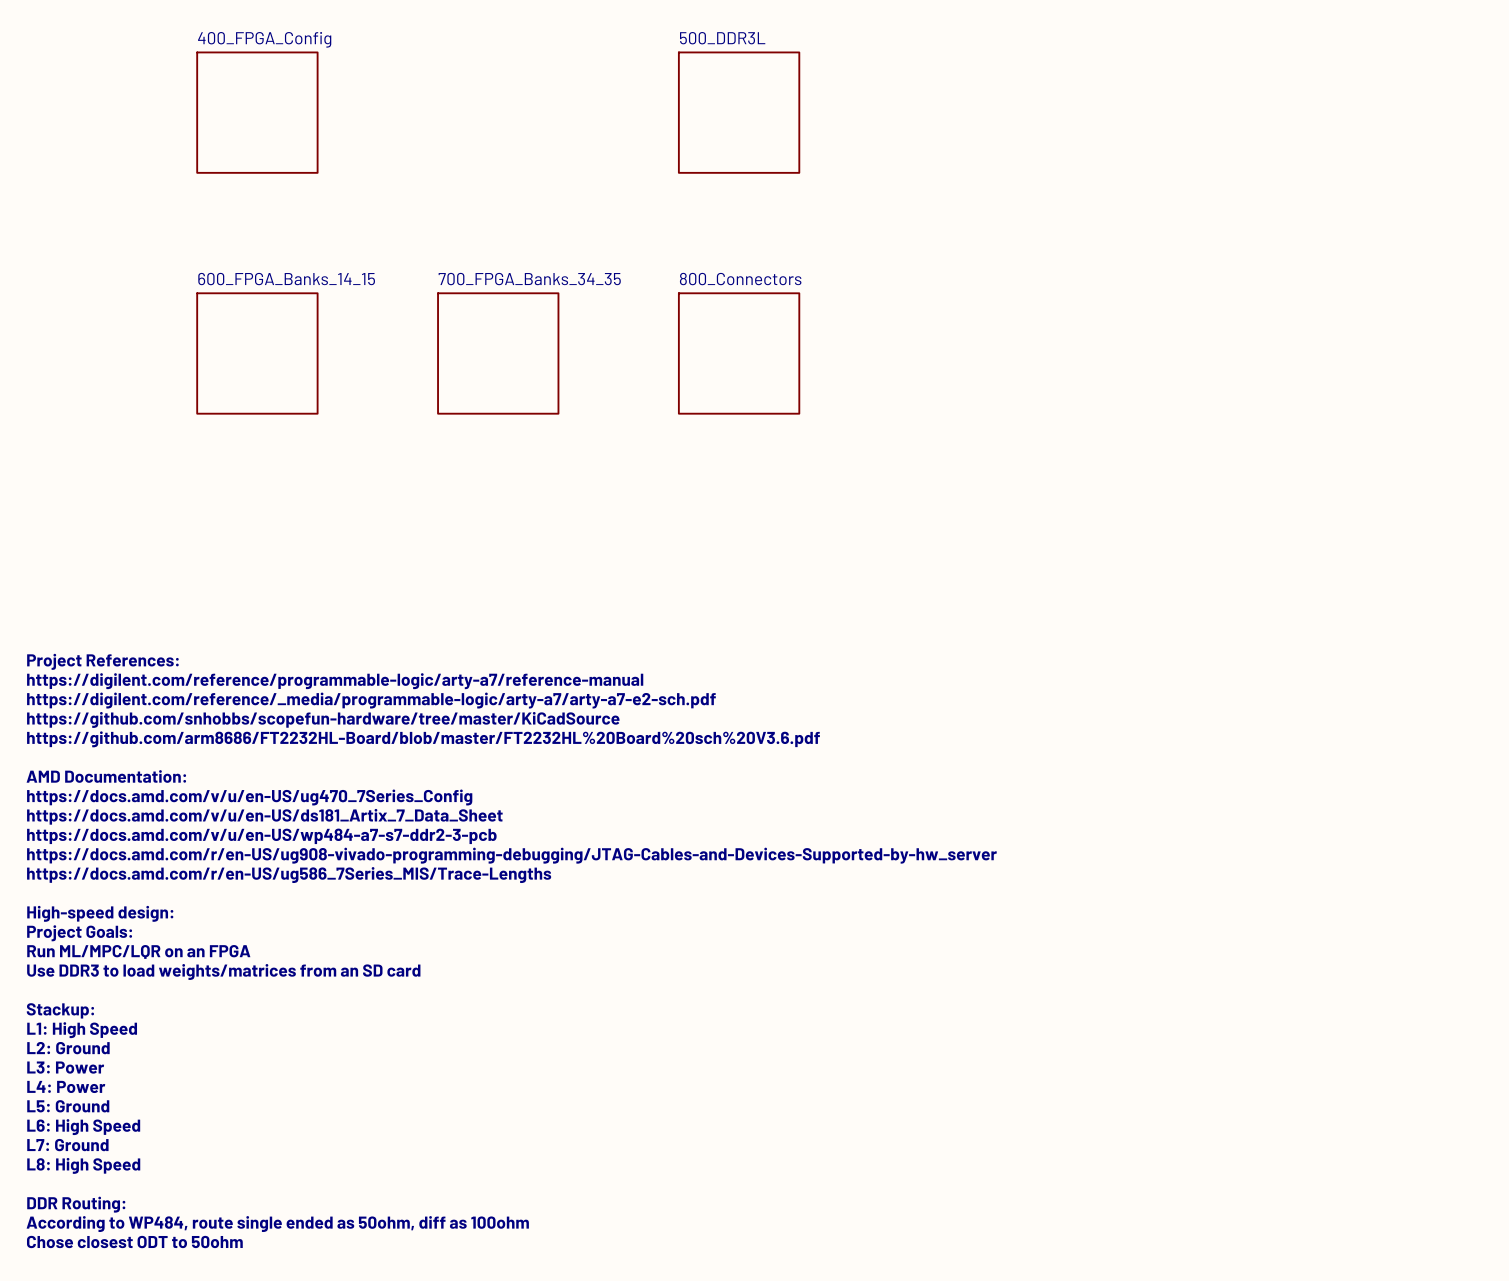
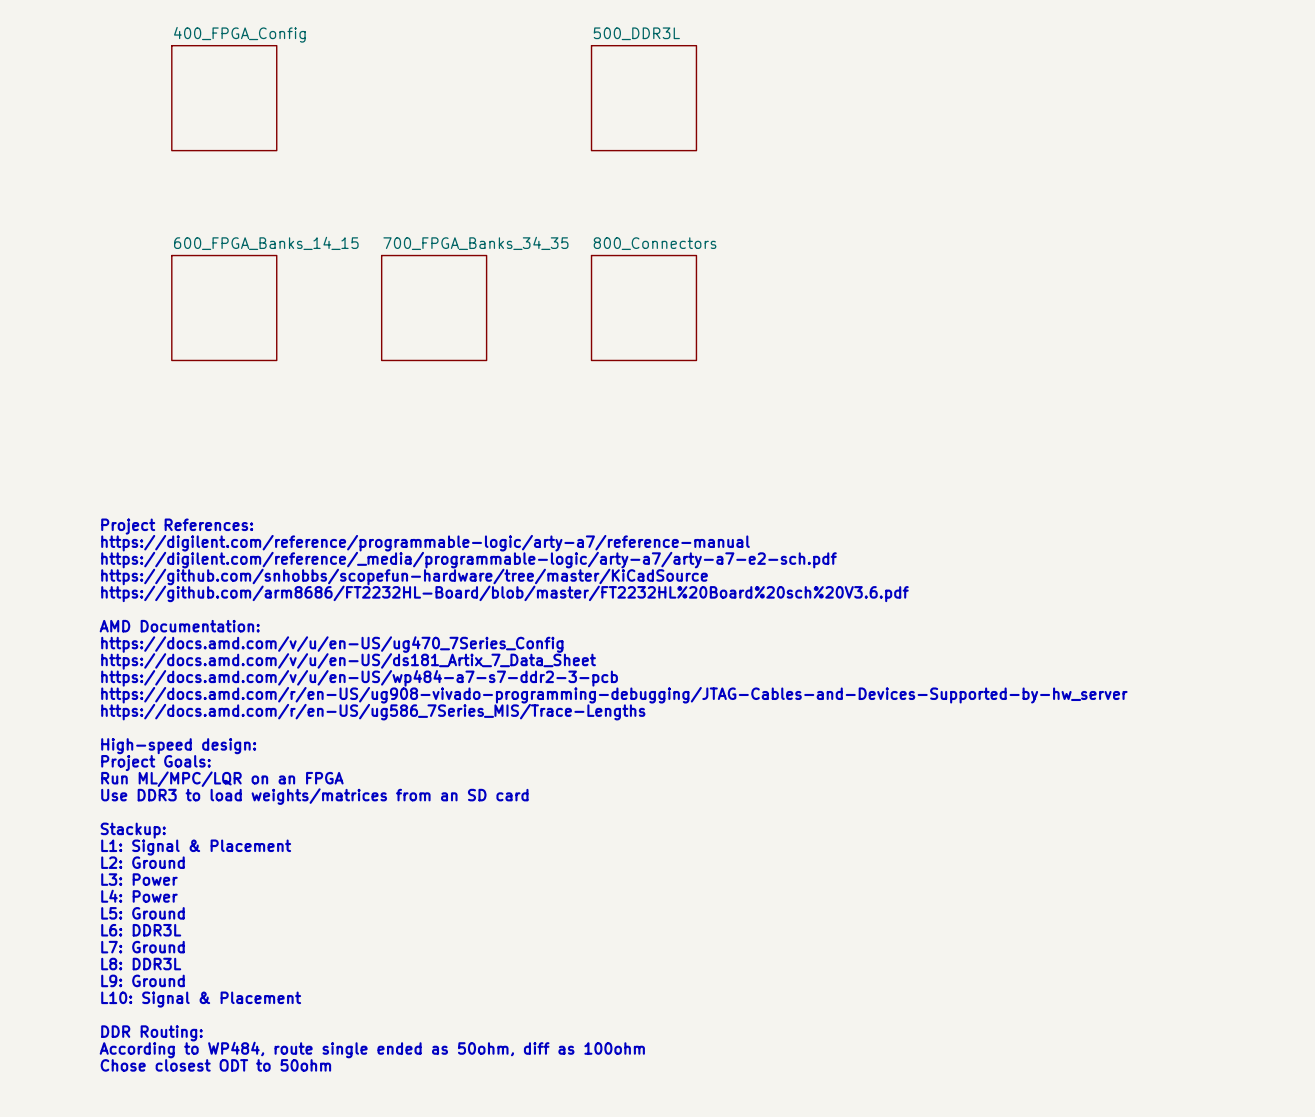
text position: Project References: (102, 661) -> Project References: (177, 526)
text position: https://digilent.com/reference/programmable-logic/arty-a7/reference-manual (335, 681) -> https://digilent.com/reference/programmable-logic/arty-a7/reference-manual (425, 543)
text position: https://digilent.com/reference/_media/programmable-logic/arty-a7/arty-a7-e2-sch.pdf (371, 700) -> https://digilent.com/reference/_media/programmable-logic/arty-a7/arty-a7-e2-sch.pdf (468, 560)
text position: https://github.com/snhobbs/scopefun-hardware/tree/master/KiCadSource (323, 719) -> https://github.com/snhobbs/scopefun-hardware/tree/master/KiCadSource (404, 576)
text position: https://github.com/arm8686/FT2232HL-Board/blob/master/FT2232HL%20Board%20sch%20V3.6.pdf (423, 739) -> https://github.com/arm8686/FT2232HL-Board/blob/master/FT2232HL%20Board%20sch%20V3.6.pdf (504, 593)
text position: AMD Documentation: (106, 776) -> AMD Documentation: (179, 626)
text position: https://docs.amd.com/v/u/en-US/ug470_7Series_Config (249, 797) -> https://docs.amd.com/v/u/en-US/ug470_7Series_Config (332, 644)
text position: https://docs.amd.com/v/u/en-US/ds181_Artix_7_Data_Sheet (264, 816) -> https://docs.amd.com/v/u/en-US/ds181_Artix_7_Data_Sheet (348, 661)
text position: https://docs.amd.com/v/u/en-US/wp484-a7-s7-ddr2-3-pcb (261, 836) -> https://docs.amd.com/v/u/en-US/wp484-a7-s7-ddr2-3-pcb (359, 678)
text position: https://docs.amd.com/r/en-US/ug908-vivado-programming-debugging/JTAG-Cables-and-Devices-Supported-by-hw_server (511, 855) -> https://docs.amd.com/r/en-US/ug908-vivado-programming-debugging/JTAG-Cables-and-Devices-Supported-by-hw_server (614, 695)
text position: https://docs.amd.com/r/en-US/ug586_7Series_MIS/Trace-Lengths (289, 875) -> https://docs.amd.com/r/en-US/ug586_7Series_MIS/Trace-Lengths (373, 712)
text position: High-speed design: (100, 913) -> High-speed design: (178, 746)
text position: Project Goals: (79, 933) -> Project Goals: (155, 763)
text position: Run ML/MPC/LQR on an FPGA (138, 951) -> Run ML/MPC/LQR on an FPGA (222, 779)
text: none -> L1: Signal & Placement (196, 847)
text position: Use DDR3 to load weights/matrices from an SD card (223, 972) -> Use DDR3 to load weights/matrices from an SD card (314, 796)
text position: Stackup: (60, 1010) -> Stackup: (133, 830)
text: L1: High Speed (82, 1030) -> none
text position: L2: Ground (68, 1048) -> L2: Ground (142, 862)
text position: L3: Power (65, 1067) -> L3: Power (139, 879)
text: none -> L6: DDR3L (141, 930)
text position: L4: Power (66, 1086) -> L4: Power (139, 896)
text position: L5: Ground (68, 1106) -> L5: Ground (142, 913)
text: none -> L8: DDR3L (141, 964)
text: none -> L9: Ground (142, 980)
text: L6: High Speed (83, 1127) -> none
text position: L7: Ground (67, 1145) -> L7: Ground (142, 947)
text: none -> L10: Signal & Placement (201, 999)
text: L8: High Speed (83, 1165) -> none
text position: DDR Routing: (76, 1204) -> DDR Routing: (151, 1033)
text position: According to WP484, route single ended as 50ohm, diff as 100ohm (277, 1224) -> According to WP484, route single ended as 50ohm, diff as 100ohm (372, 1049)
text position: Chose closest ODT to 50ohm (134, 1242) -> Chose closest ODT to 50ohm (215, 1065)

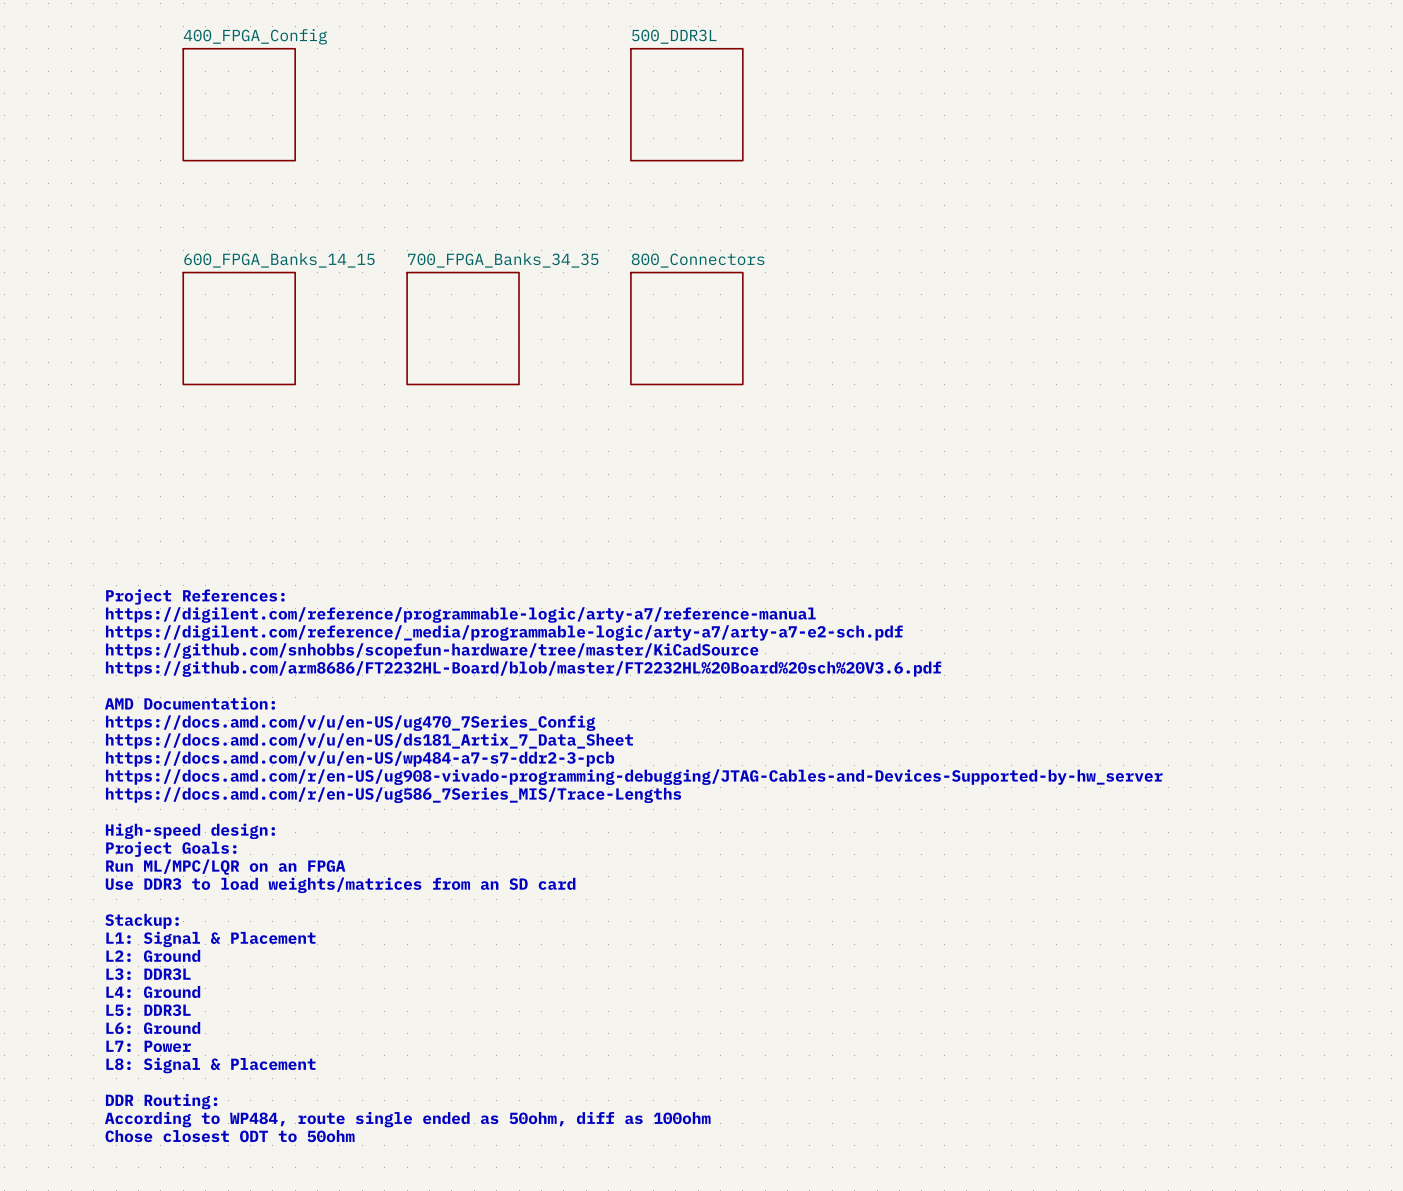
text: Project References: (177, 526) -> none
text: https://digilent.com/reference/programmable-logic/arty-a7/reference-manual (425, 543) -> none
text: https://digilent.com/reference/_media/programmable-logic/arty-a7/arty-a7-e2-sch.pdf (468, 560) -> Project References: (195, 596)
text: https://github.com/snhobbs/scopefun-hardware/tree/master/KiCadSource (404, 576) -> https://digilent.com/reference/programmable-logic/arty-a7/reference-manual (460, 615)
text: https://github.com/arm8686/FT2232HL-Board/blob/master/FT2232HL%20Board%20sch%20V3.6.pdf (504, 593) -> https://digilent.com/reference/_media/programmable-logic/arty-a7/arty-a7-e2-sch.pdf (504, 633)
text: none -> https://github.com/snhobbs/scopefun-hardware/tree/master/KiCadSource (432, 651)
text: AMD Documentation: (179, 626) -> https://github.com/arm8686/FT2232HL-Board/blob/master/FT2232HL%20Board%20sch%20V3.6.pdf (523, 669)
text: https://docs.amd.com/v/u/en-US/ug470_7Series_Config (332, 644) -> none
text: https://docs.amd.com/v/u/en-US/ds181_Artix_7_Data_Sheet (348, 661) -> AMD Documentation: (189, 703)
text: https://docs.amd.com/v/u/en-US/wp484-a7-s7-ddr2-3-pcb (359, 678) -> https://docs.amd.com/v/u/en-US/ug470_7Series_Config (350, 723)
text: https://docs.amd.com/r/en-US/ug908-vivado-programming-debugging/JTAG-Cables-and-Devices-Supported-by-hw_server (614, 695) -> https://docs.amd.com/v/u/en-US/ds181_Artix_7_Data_Sheet (369, 741)
text: https://docs.amd.com/r/en-US/ug586_7Series_MIS/Trace-Lengths (373, 712) -> https://docs.amd.com/v/u/en-US/wp484-a7-s7-ddr2-3-pcb (360, 759)
text: none -> https://docs.amd.com/r/en-US/ug908-vivado-programming-debugging/JTAG-Cables-and-Devices-Supported-by-hw_server (634, 777)
text: High-speed design: (178, 746) -> https://docs.amd.com/r/en-US/ug586_7Series_MIS/Trace-Lengths (393, 795)
text: Project Goals: (155, 763) -> none
text: Run ML/MPC/LQR on an FPGA (222, 779) -> High-speed design: (190, 831)
text: Use DDR3 to load weights/matrices from an SD card (314, 796) -> Project Goals: (171, 849)
text: none -> Run ML/MPC/LQR on an FPGA (225, 867)
text: Stackup: (133, 830) -> Use DDR3 to load weights/matrices from an SD card (340, 885)
text: L1: Signal & Placement (196, 847) -> none
text: L2: Ground (142, 862) -> Stackup: (142, 921)
text: L3: Power (139, 879) -> L1: Signal & Placement (210, 939)
text: L4: Power (139, 896) -> L2: Ground (153, 955)
text: L5: Ground (142, 913) -> L3: DDR3L (148, 974)
text: L6: DDR3L (141, 930) -> L4: Ground (153, 991)
text: L7: Ground (142, 947) -> L5: DDR3L (148, 1010)
text: L8: DDR3L (141, 964) -> L6: Ground (153, 1028)
text: L9: Ground (142, 980) -> L7: Power (148, 1046)
text: L10: Signal & Placement (201, 999) -> L8: Signal & Placement (210, 1065)

